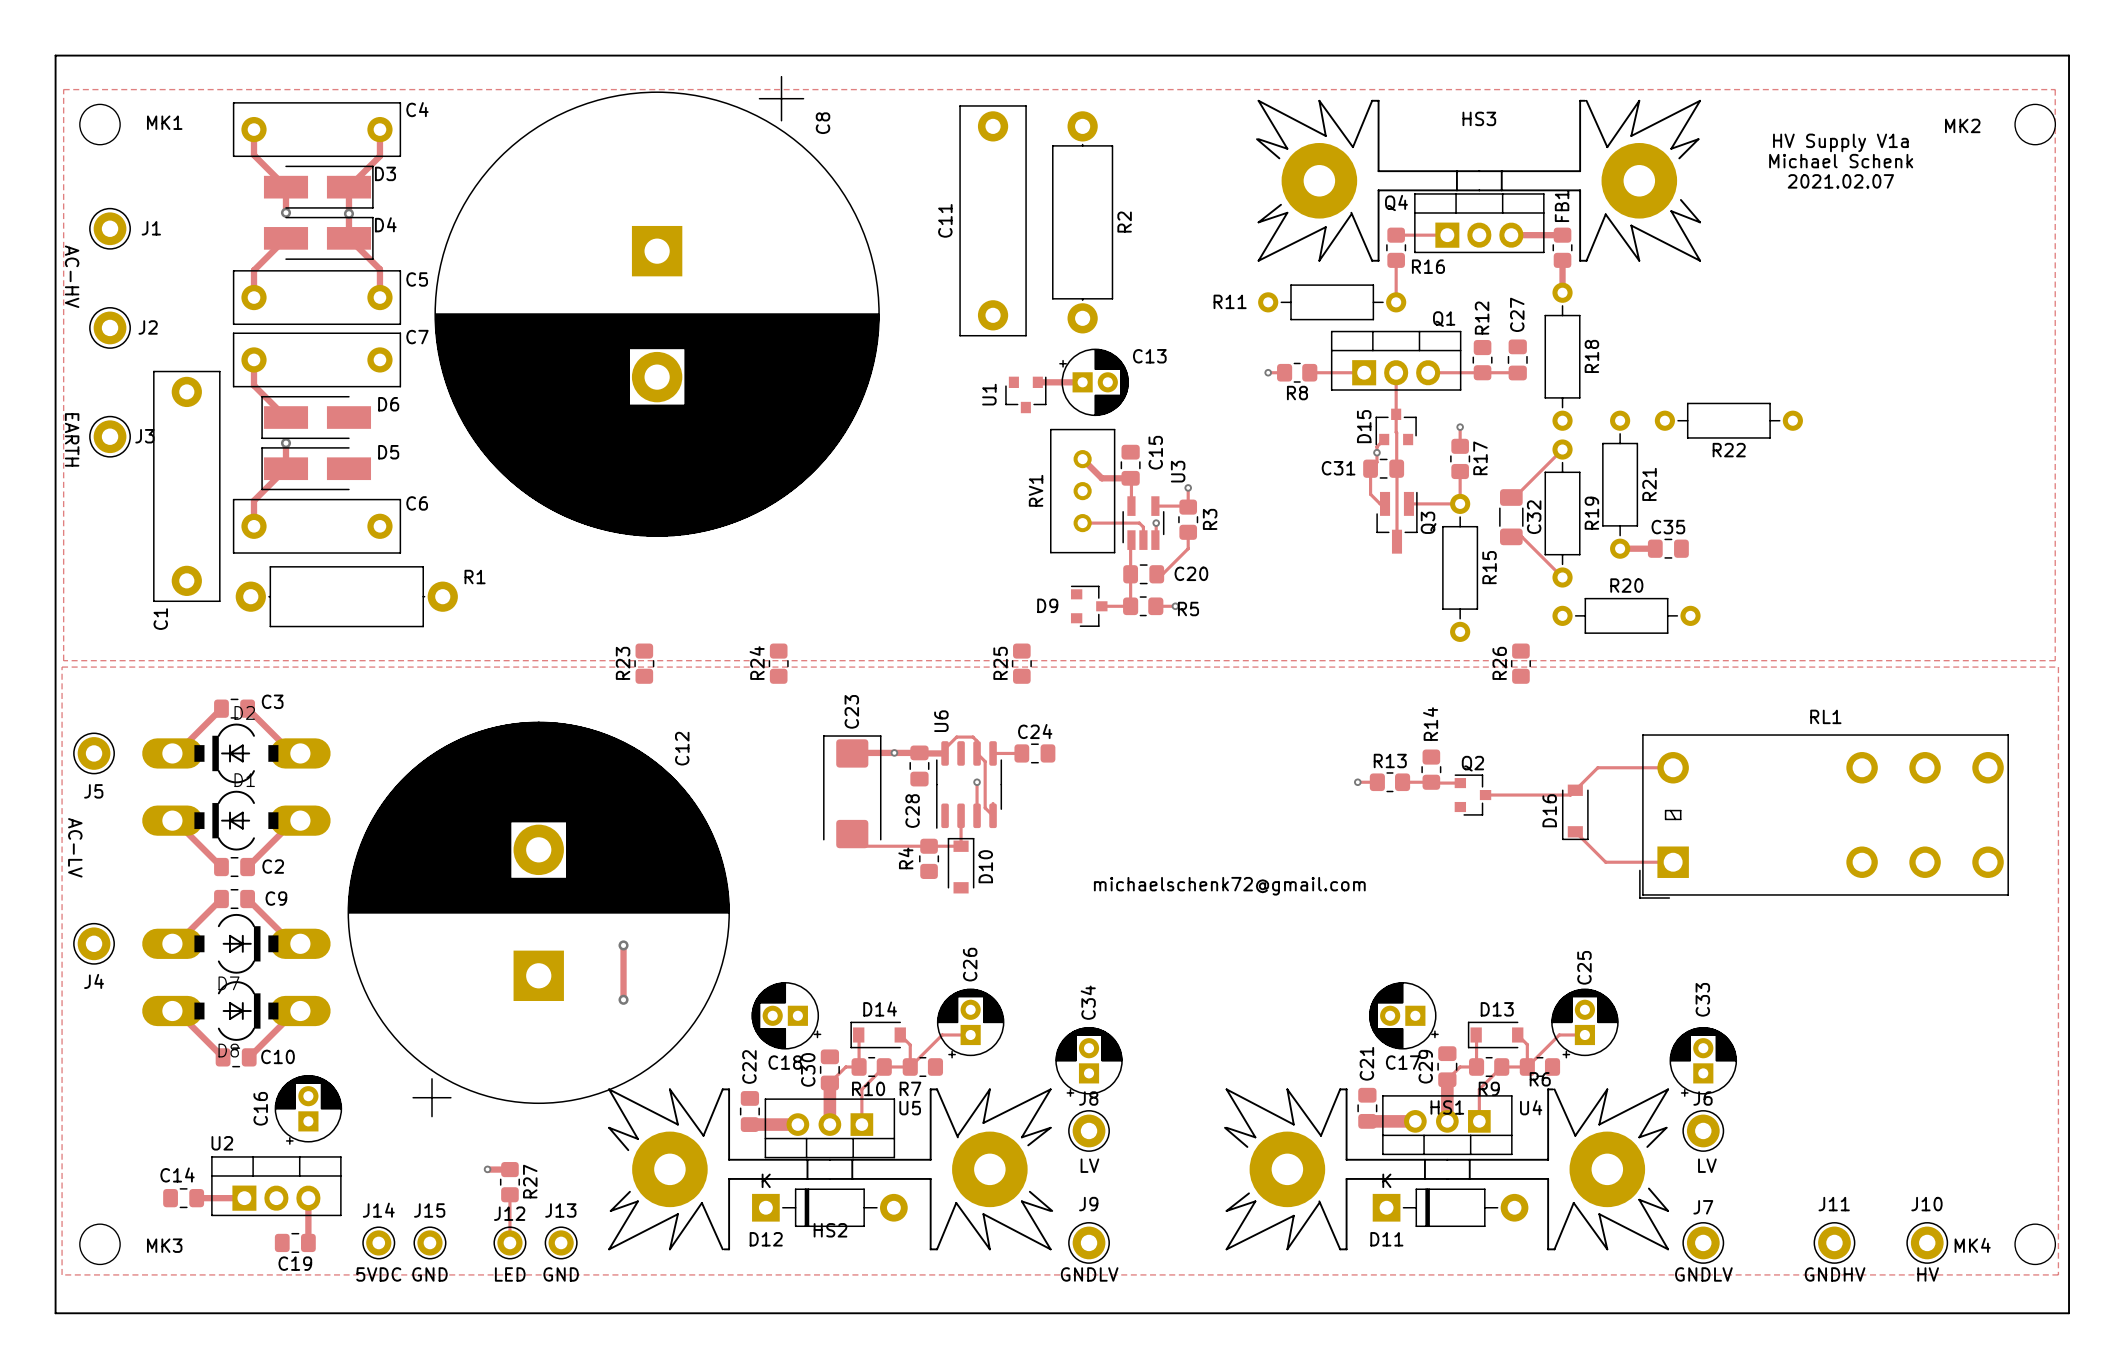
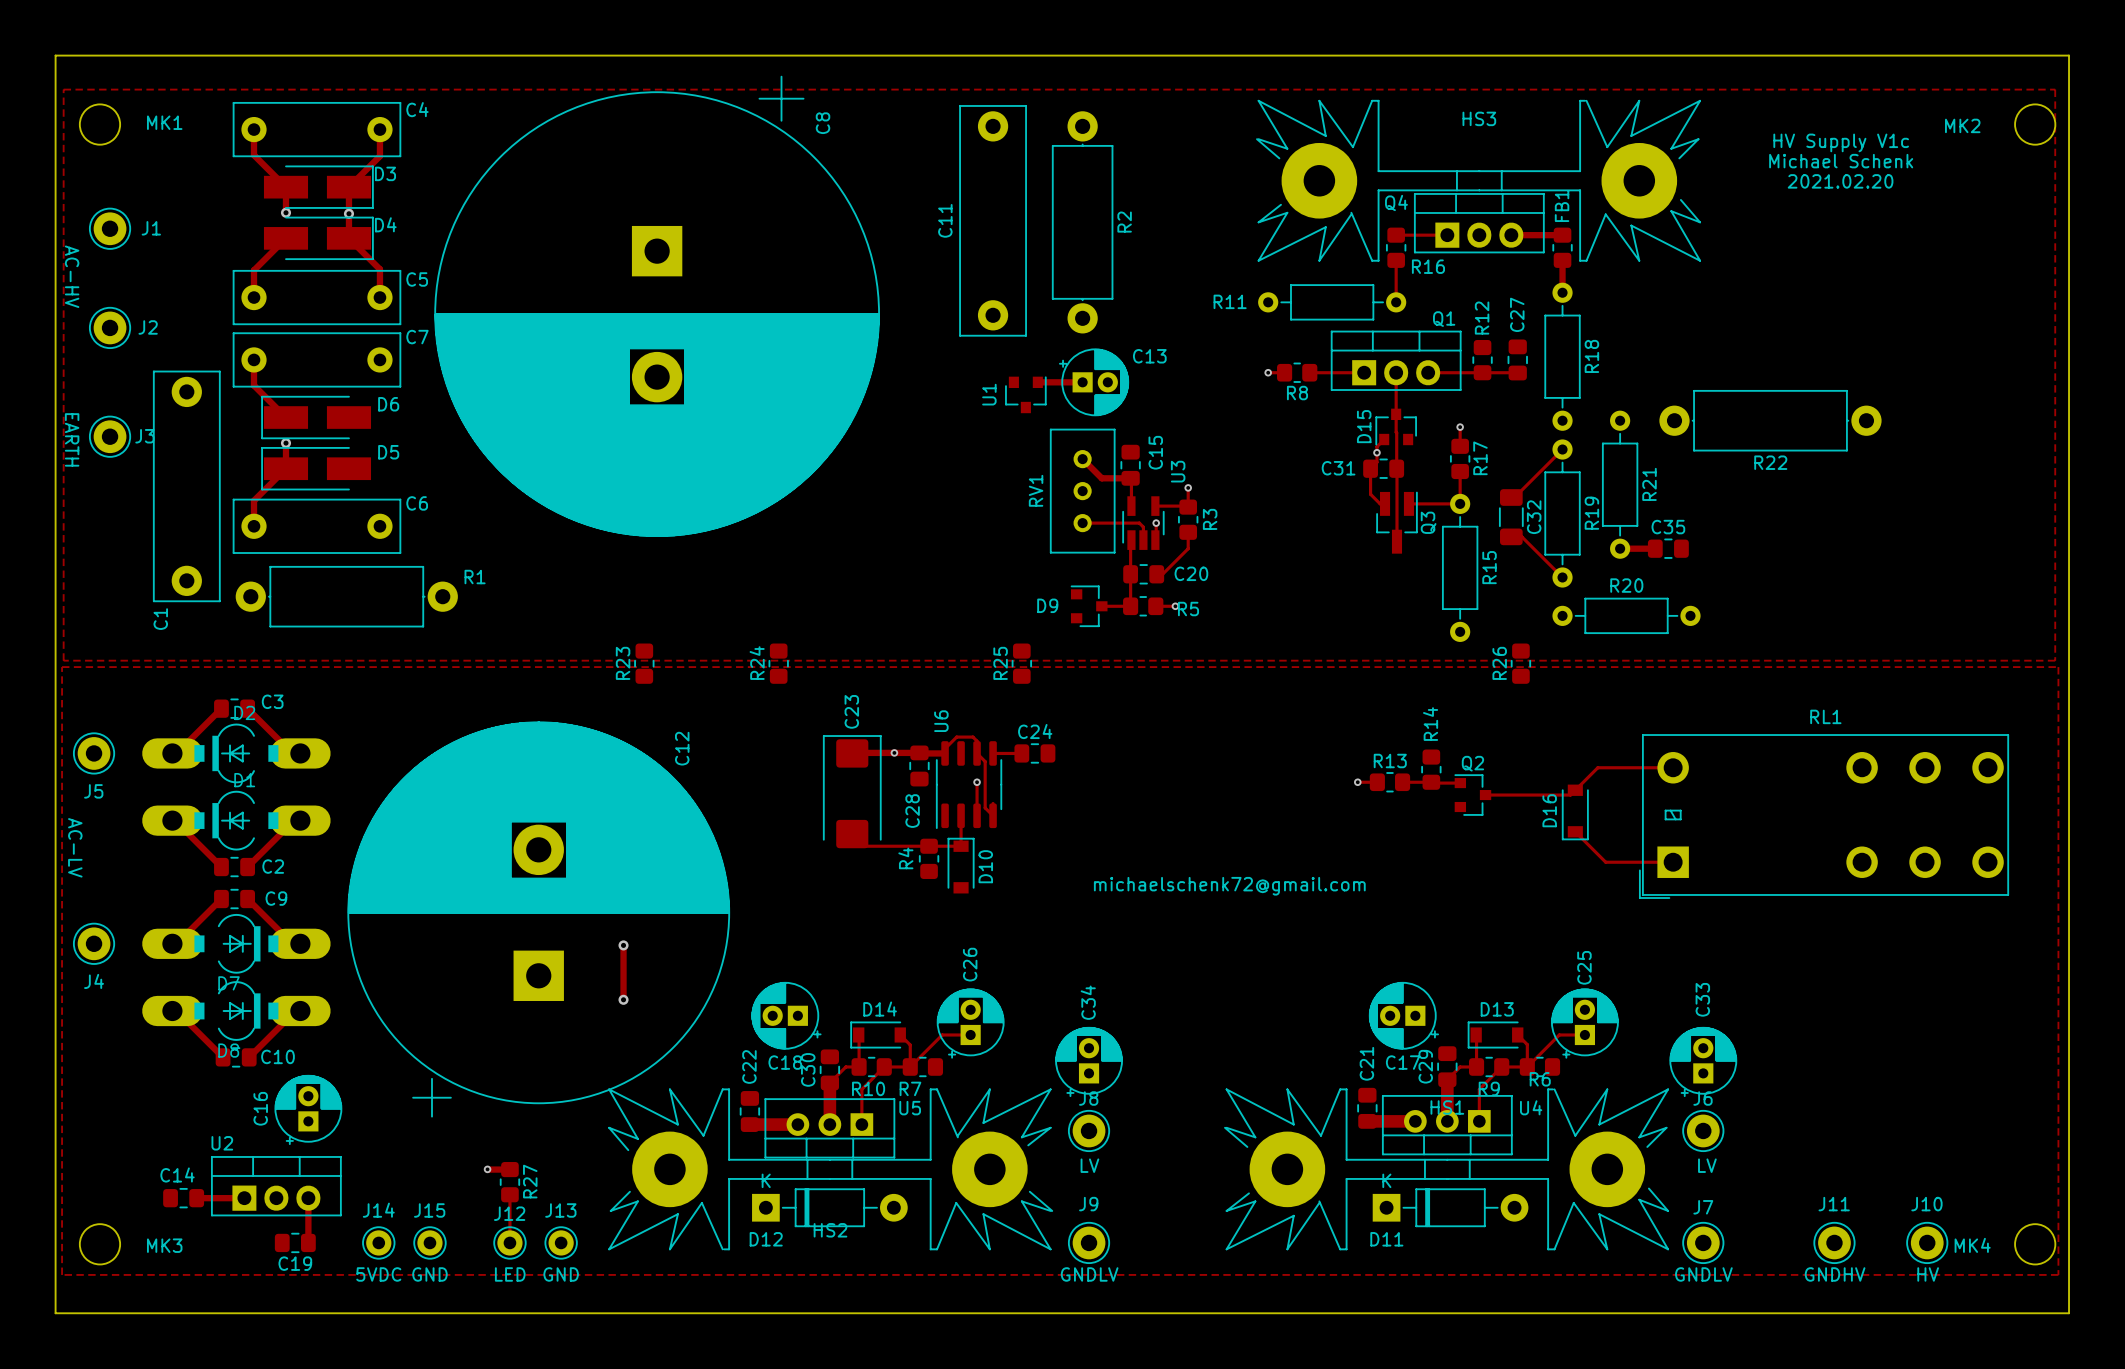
text: HV Supply V1a (1840, 142) -> HV Supply V1c (1841, 142)
text: 2021.02.07 (1840, 181) -> 2021.02.20 (1840, 181)
R22 footprint: [1654, 402, 1803, 439] -> [1659, 390, 1882, 452]

